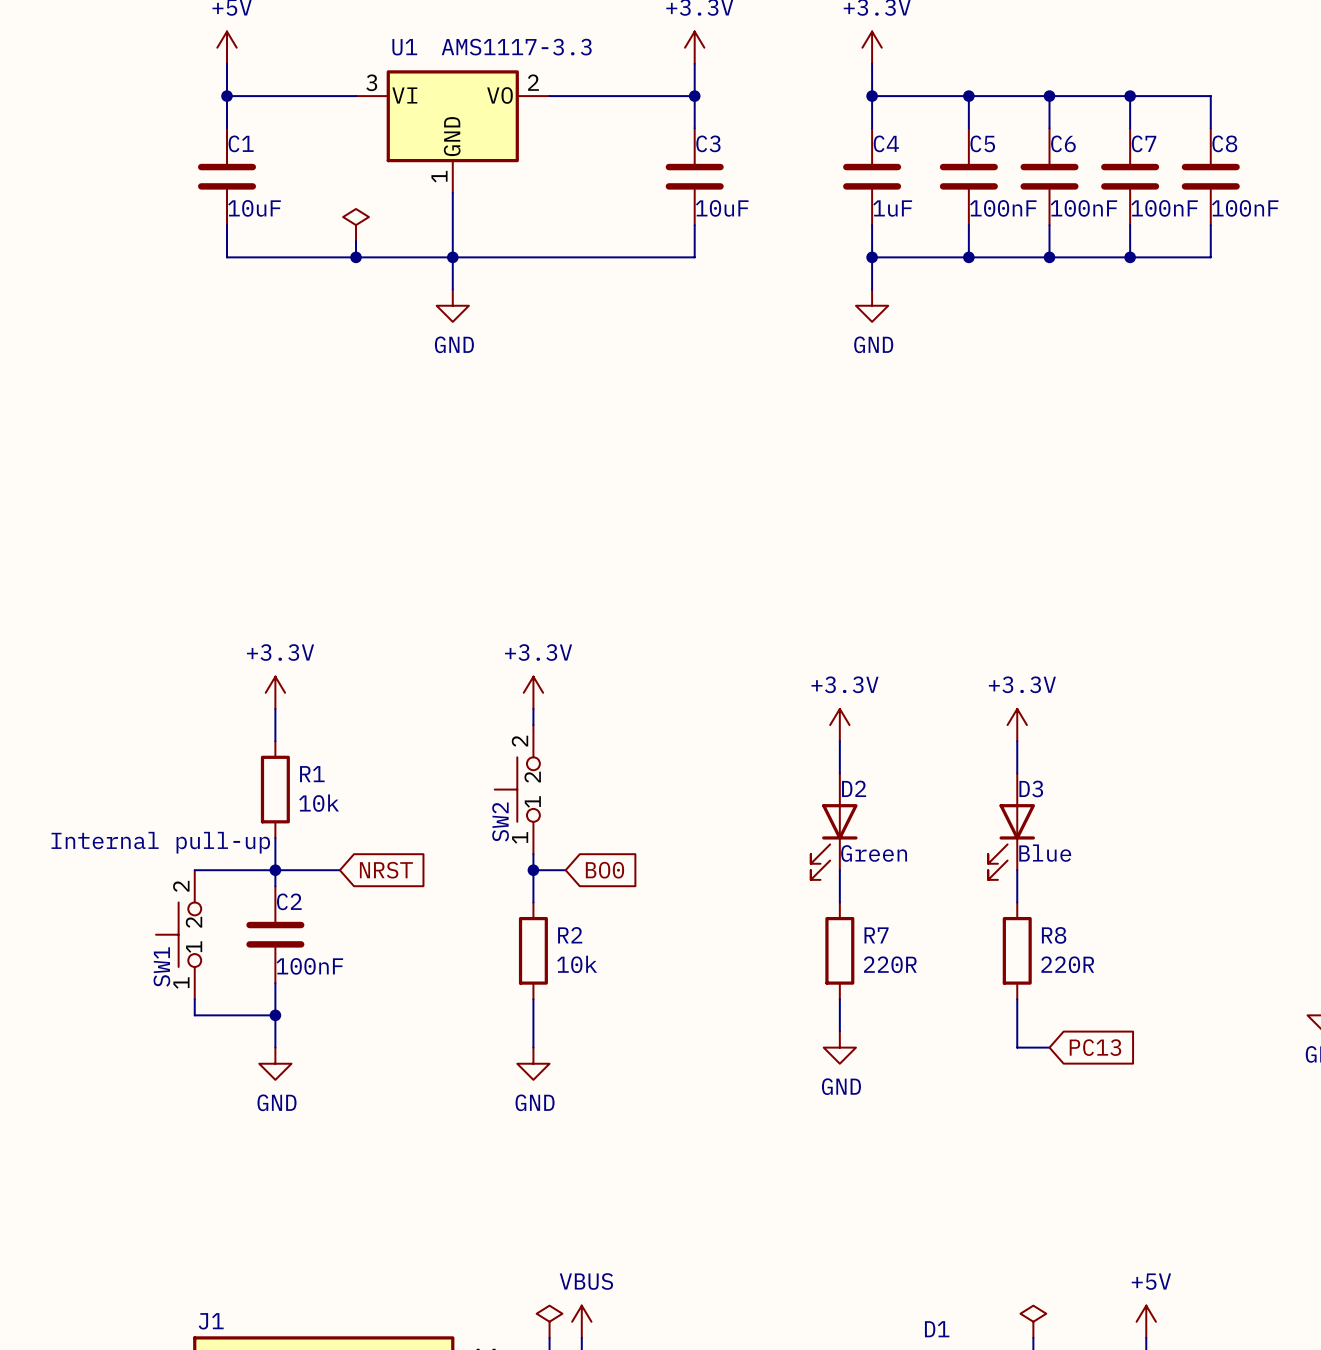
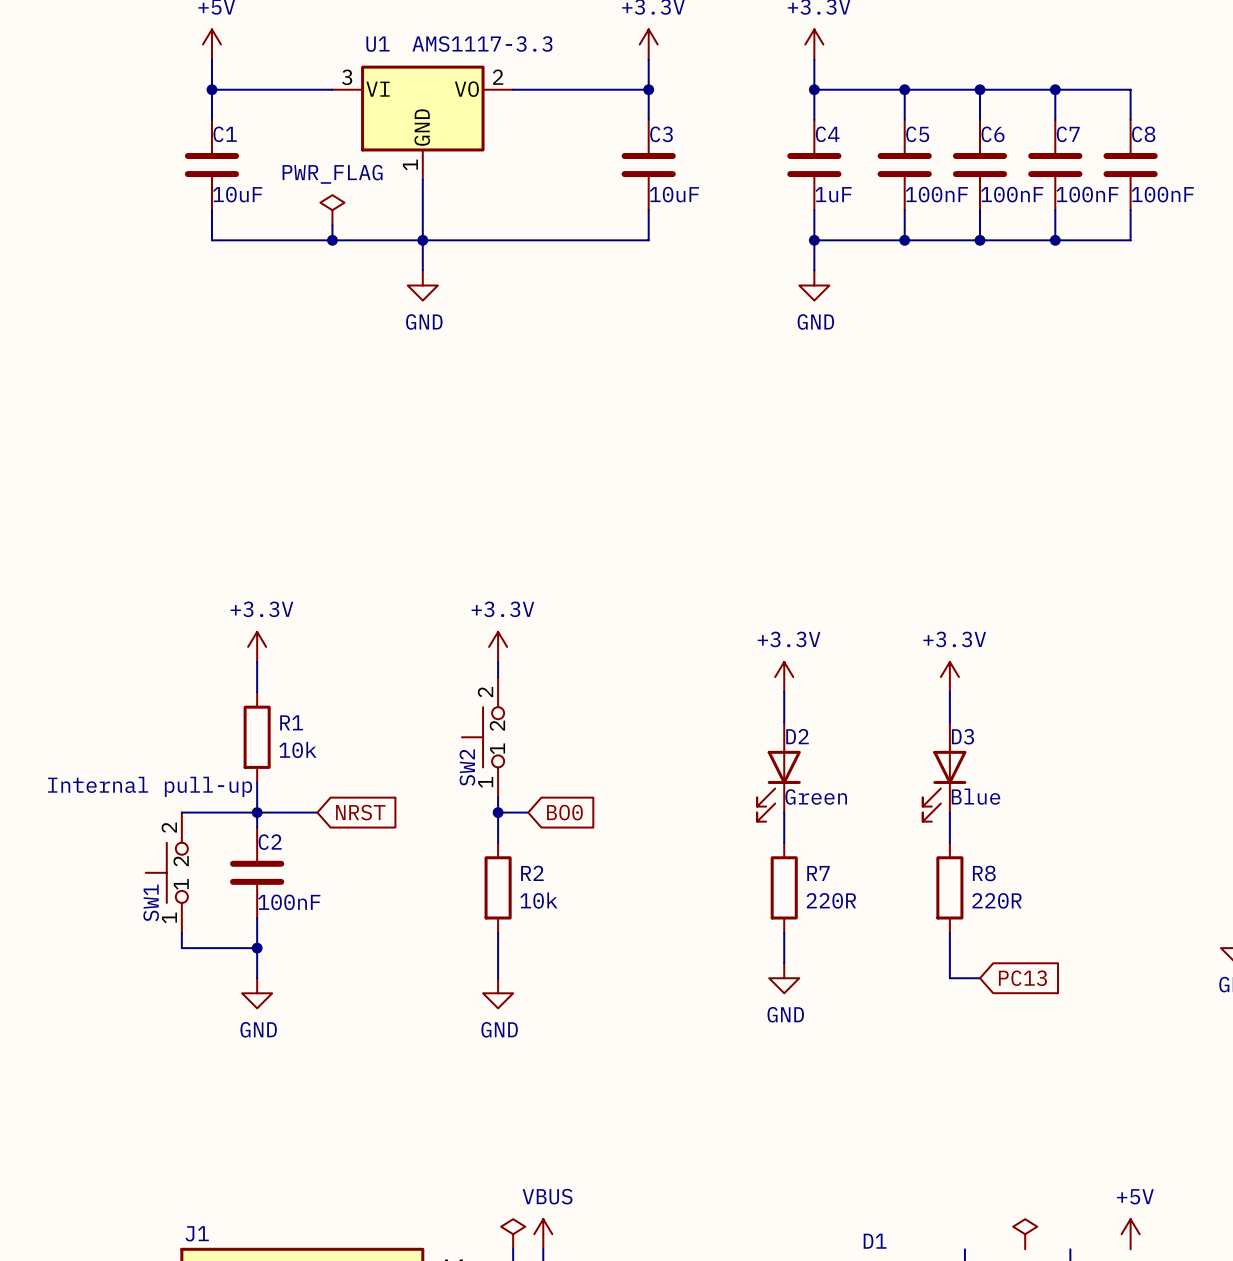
power symbol text: none -> PWR_FLAG (332, 174)
power symbol position: (1033, 1321) -> (1025, 1234)
power symbol position: +5V (1146, 1321) -> +5V (1130, 1234)

